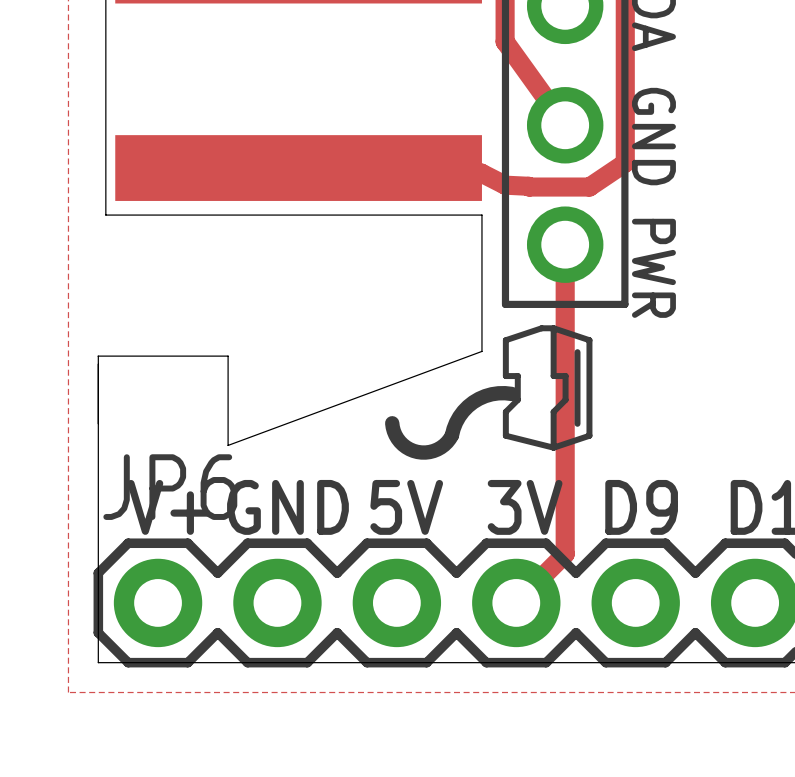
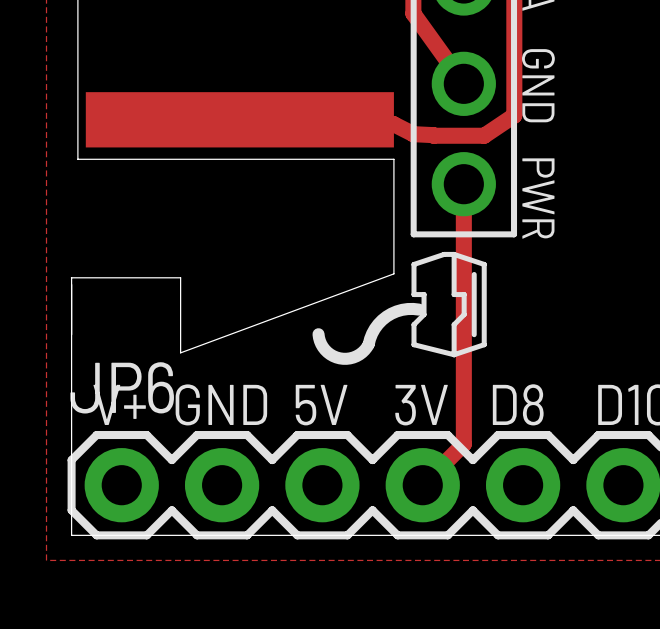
text: D9 (641, 507) -> D8 (518, 404)

